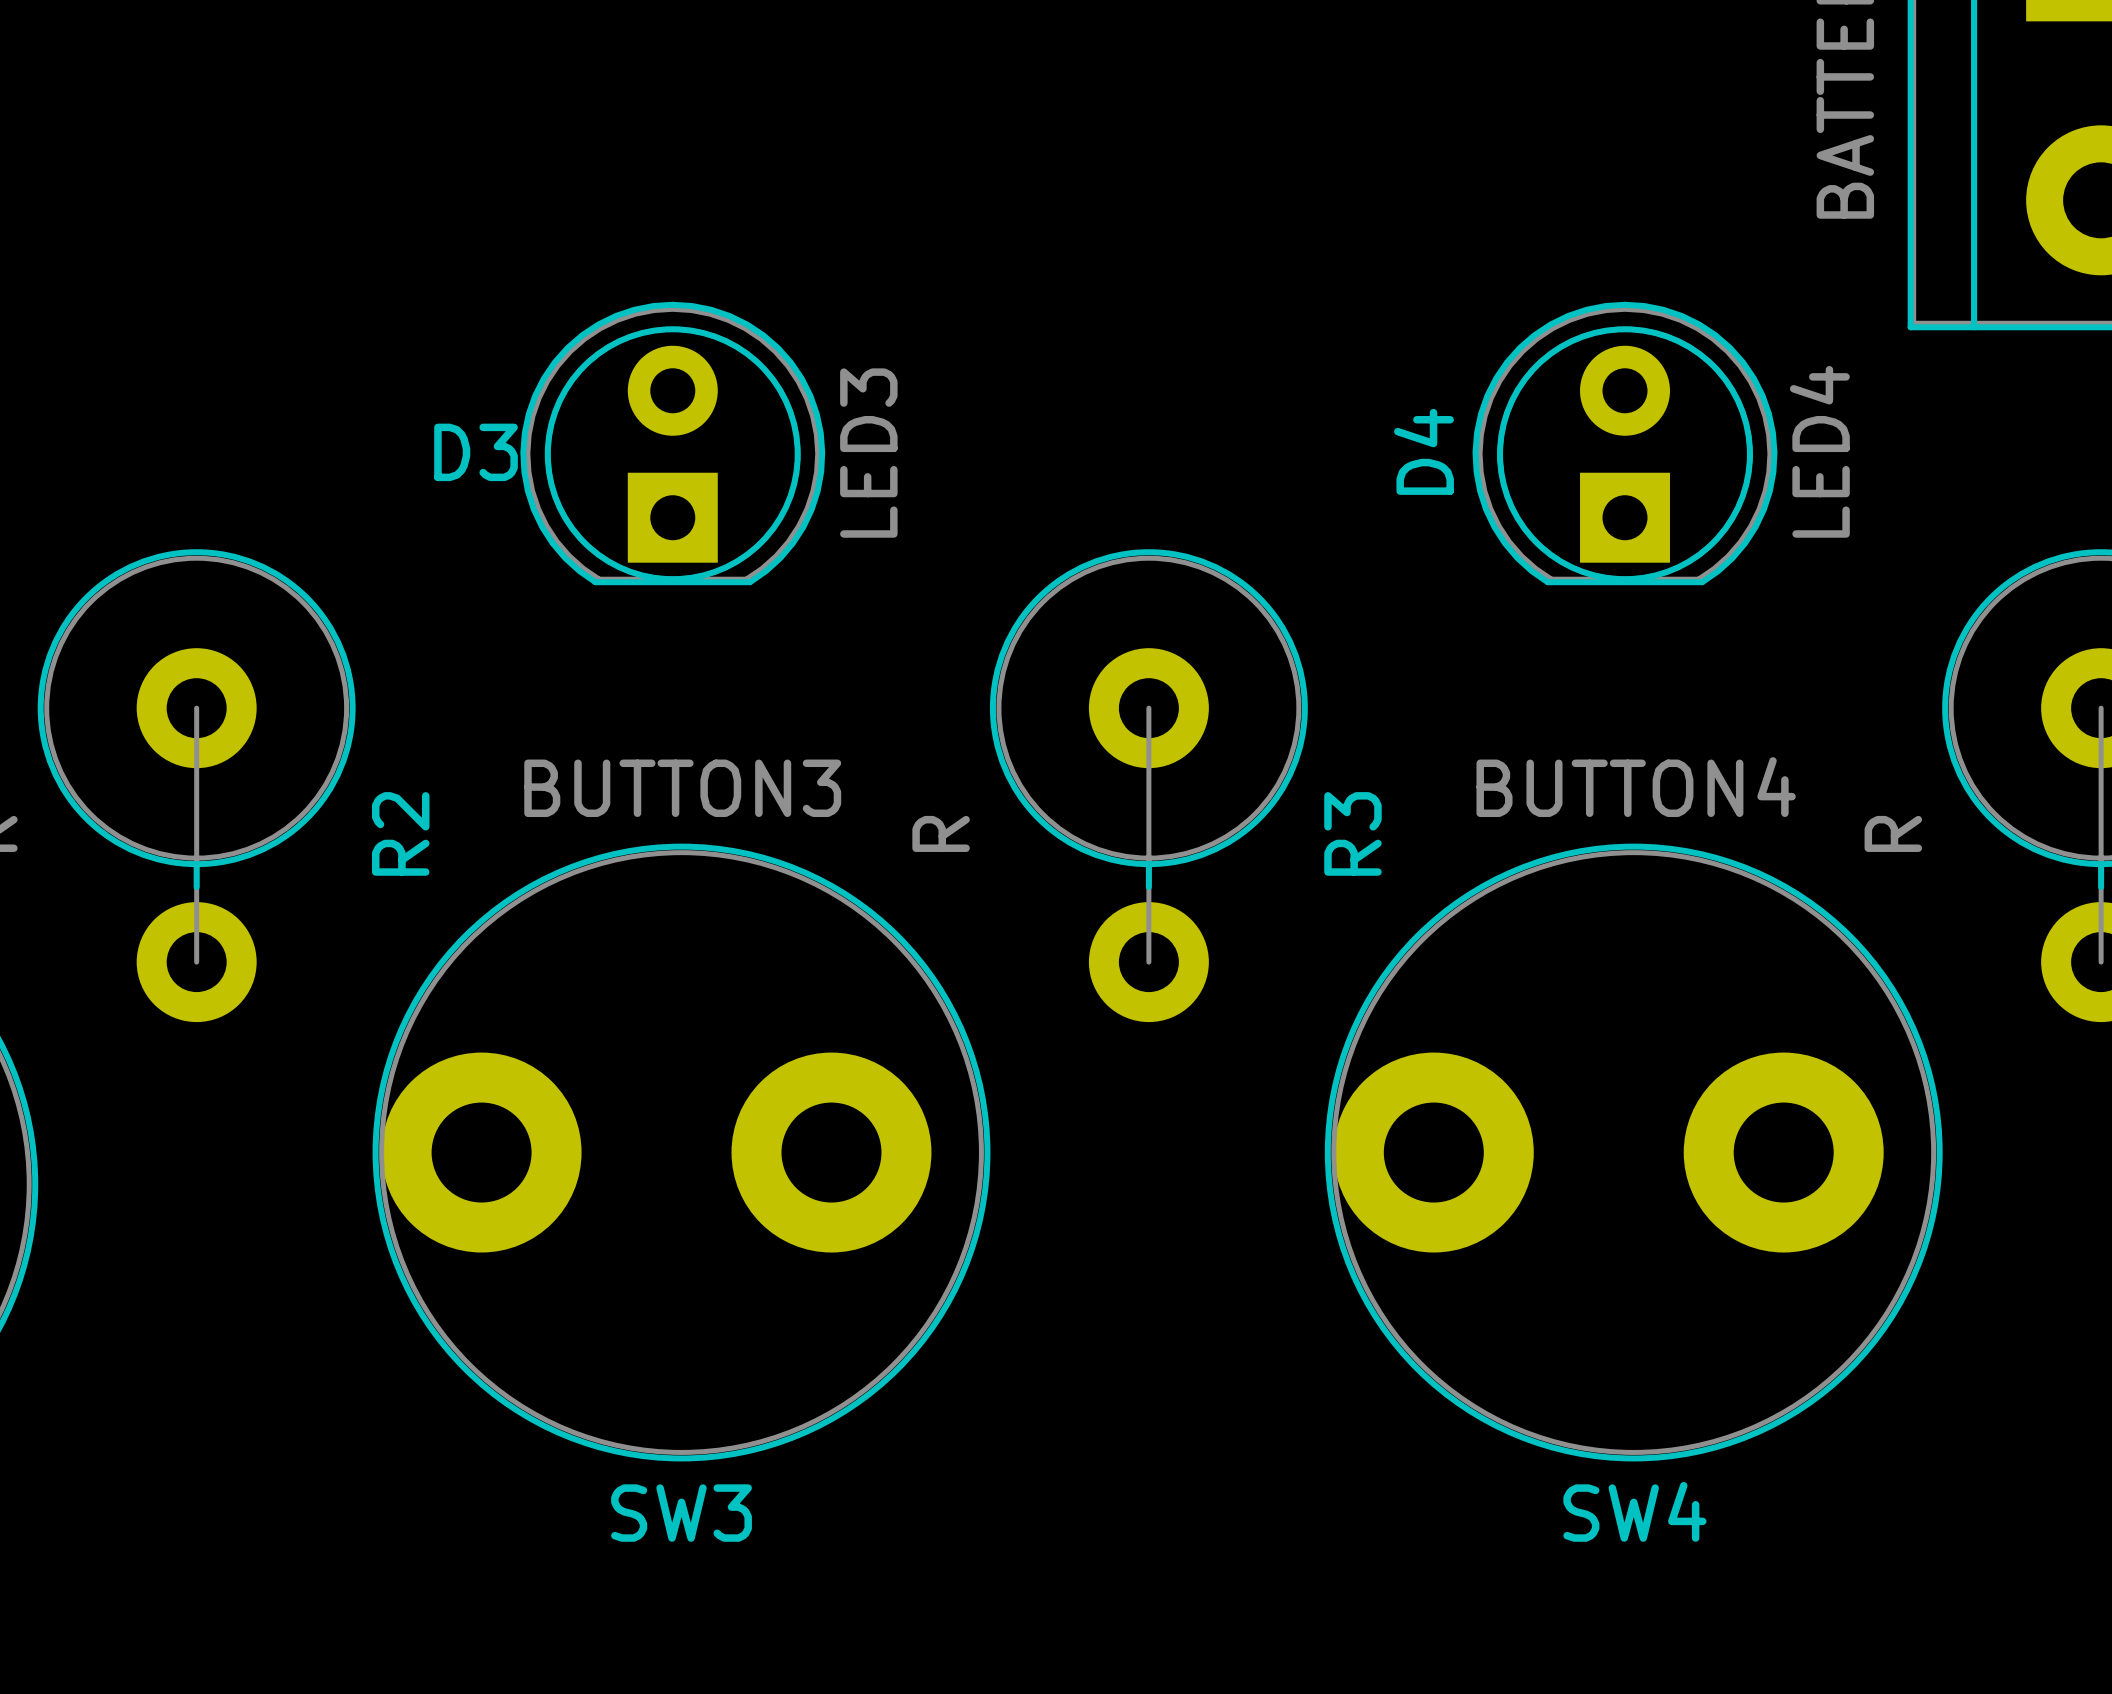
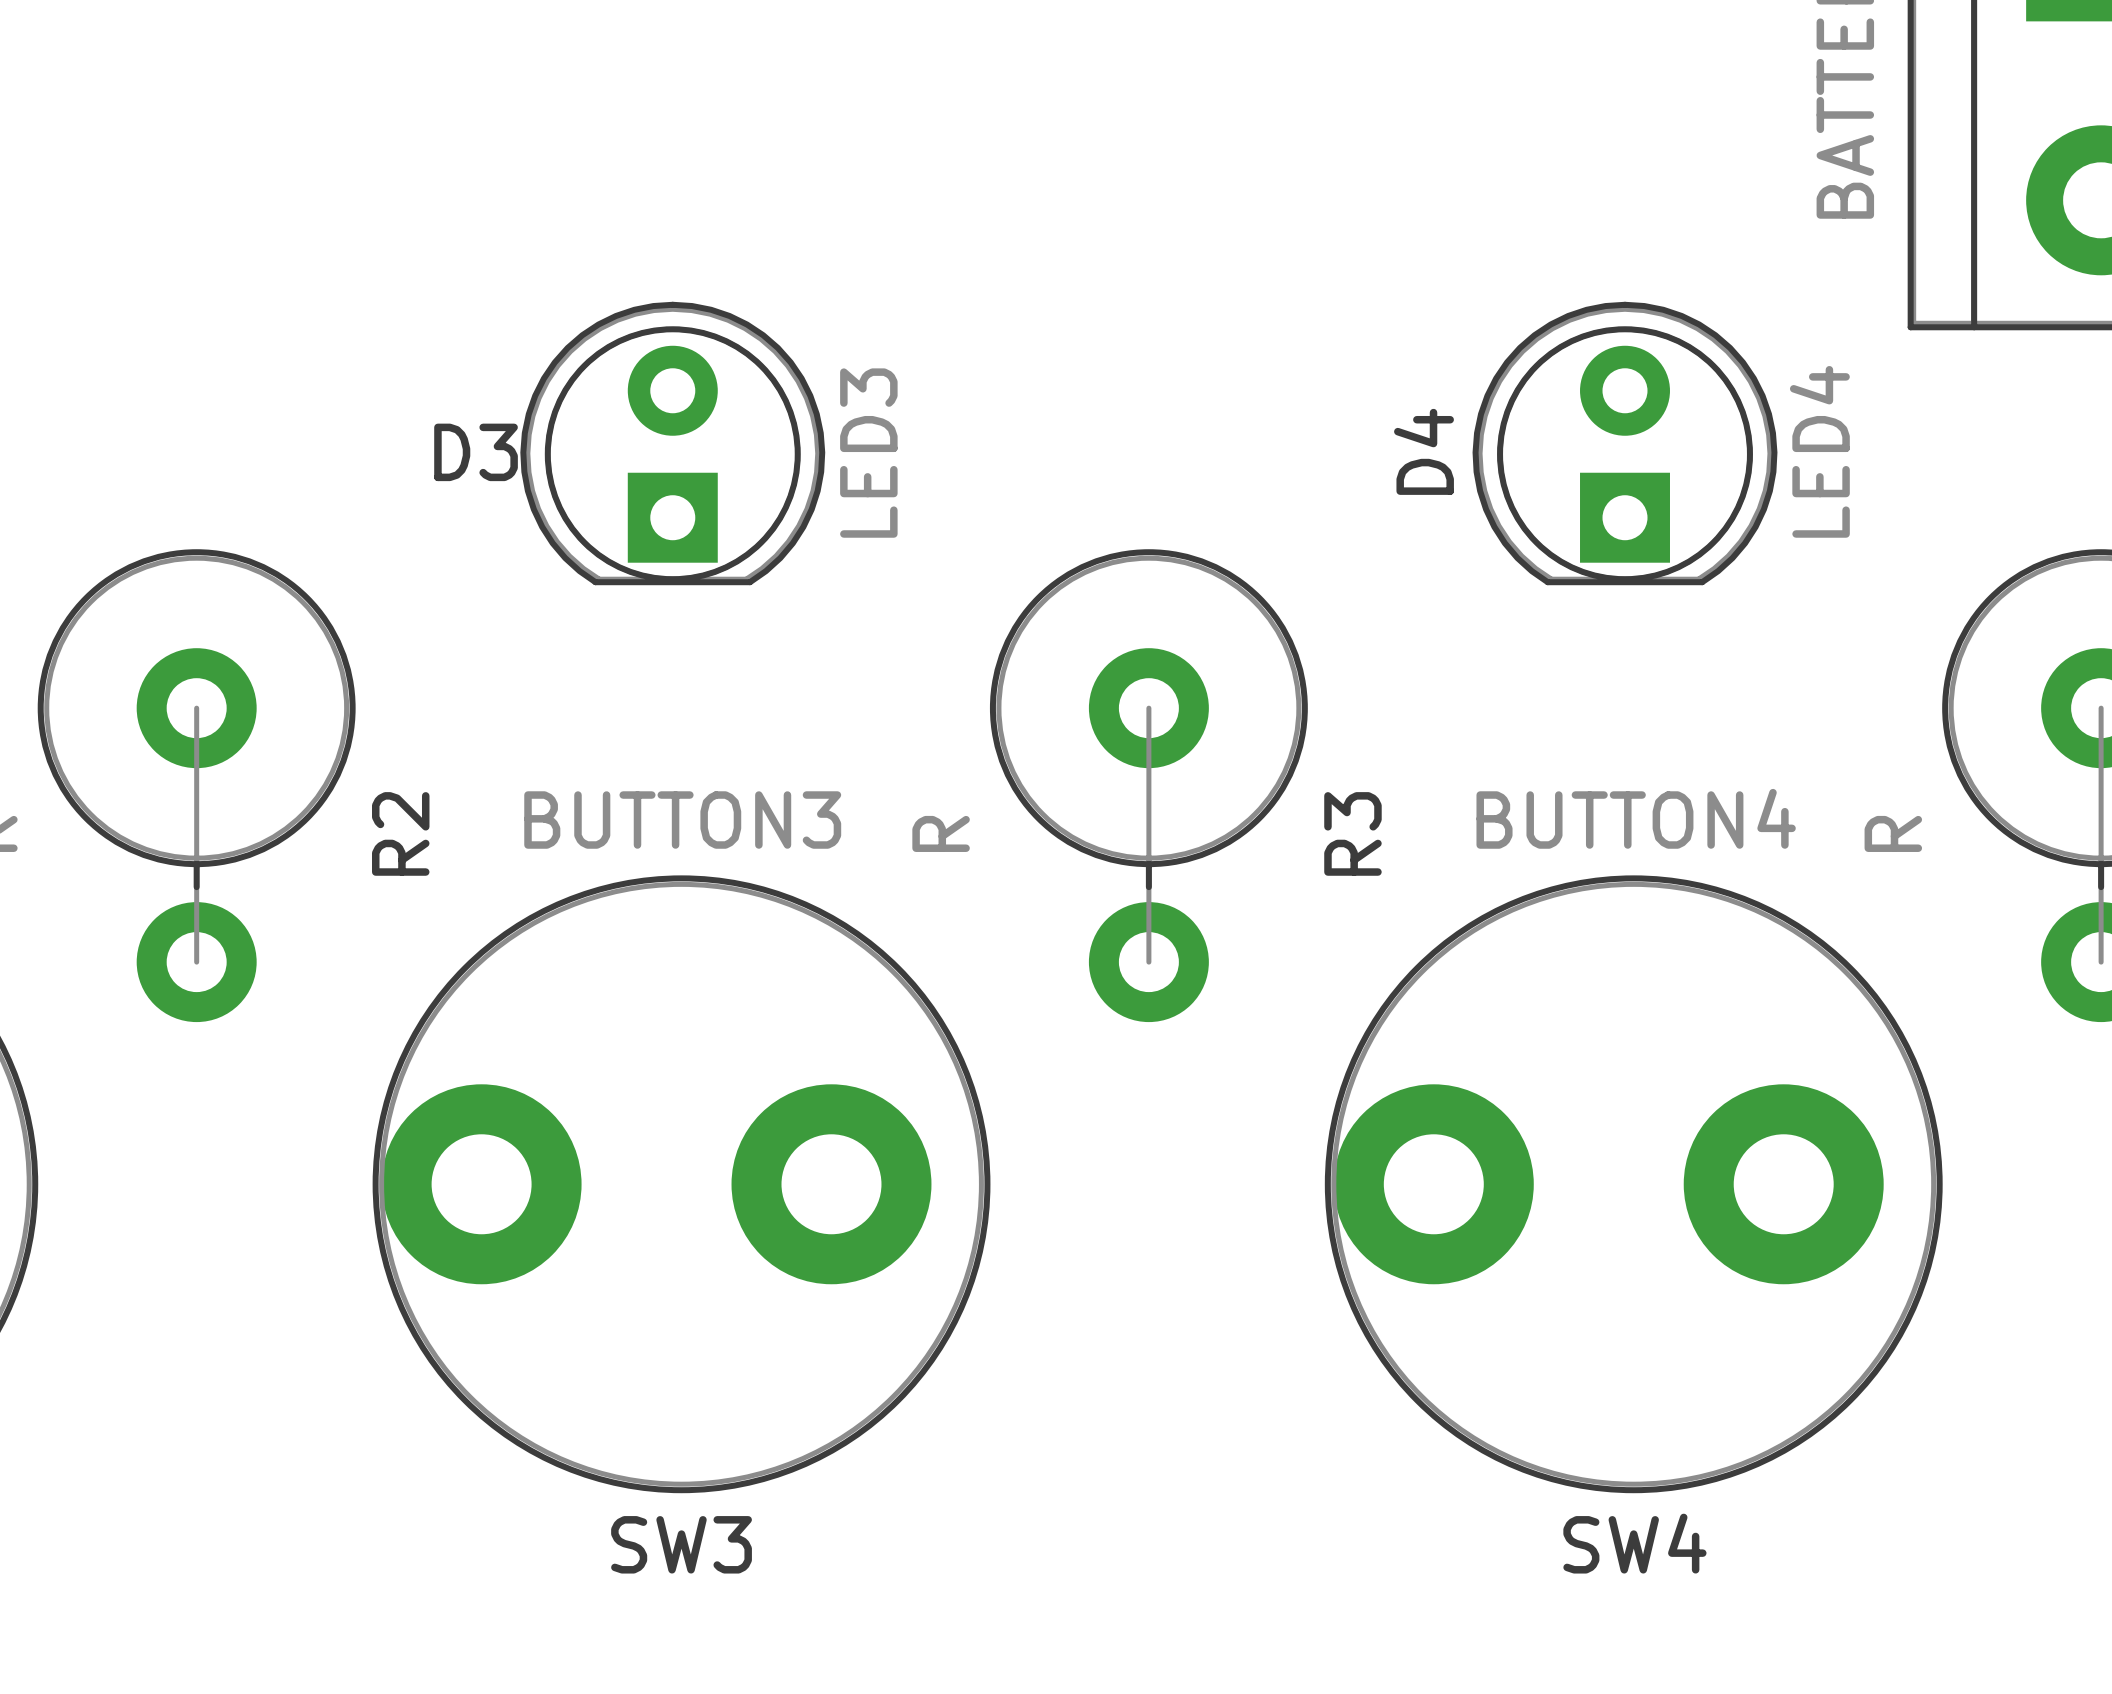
SW3 position: (681, 1152) -> (681, 1184)
SW4 position: (1633, 1152) -> (1633, 1184)

